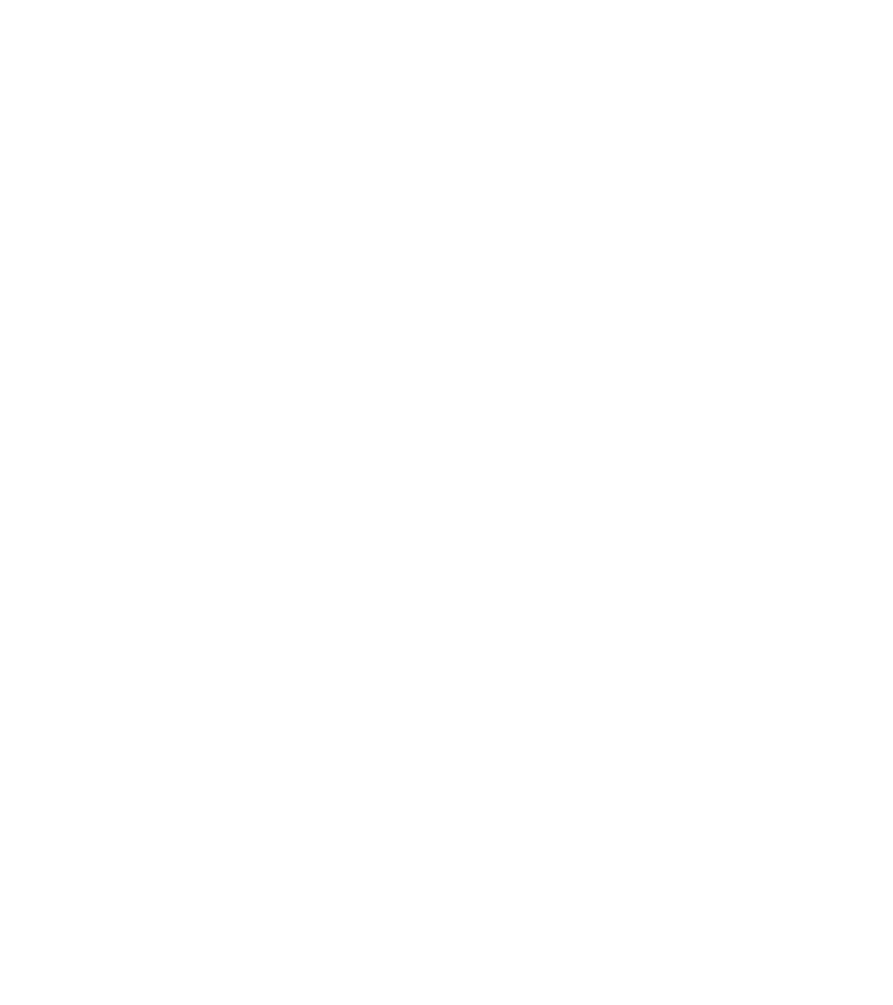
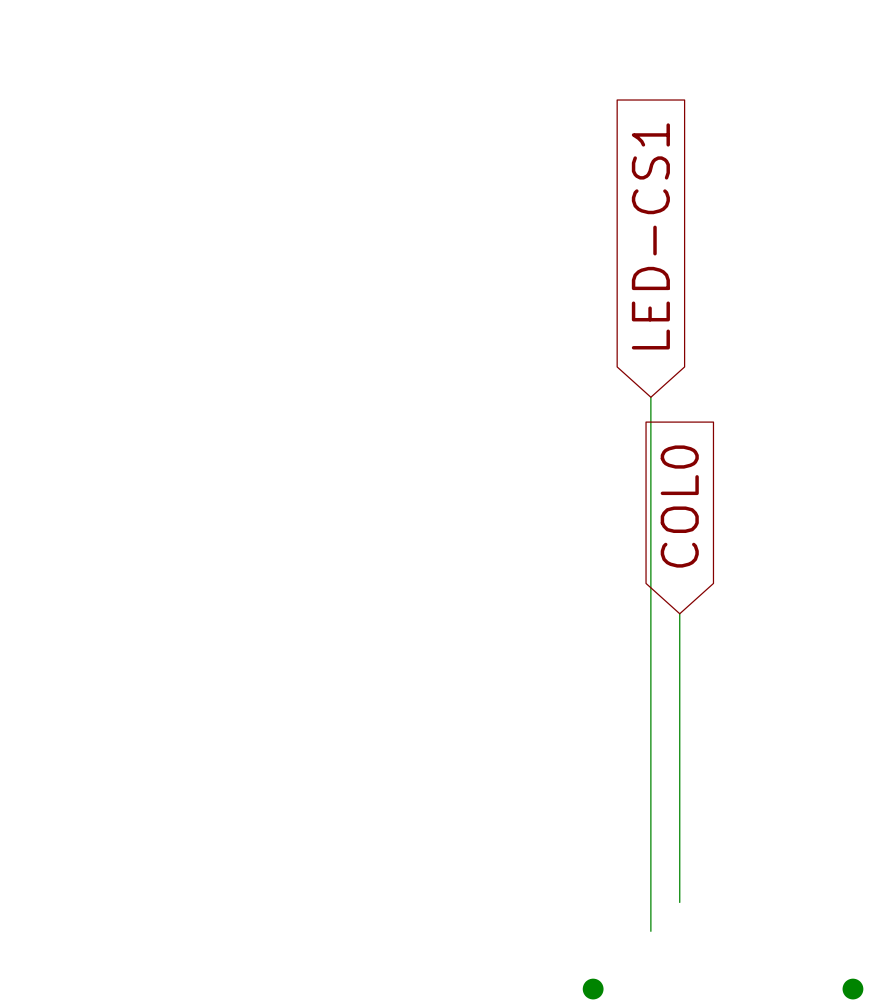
global label: none -> LED-CS1 (650, 236)
wire: none -> (650, 397) (650, 931)
global label: none -> COL0 (679, 506)
wire: none -> (679, 613) (679, 902)
junction: none -> (593, 989)
junction: none -> (852, 989)

